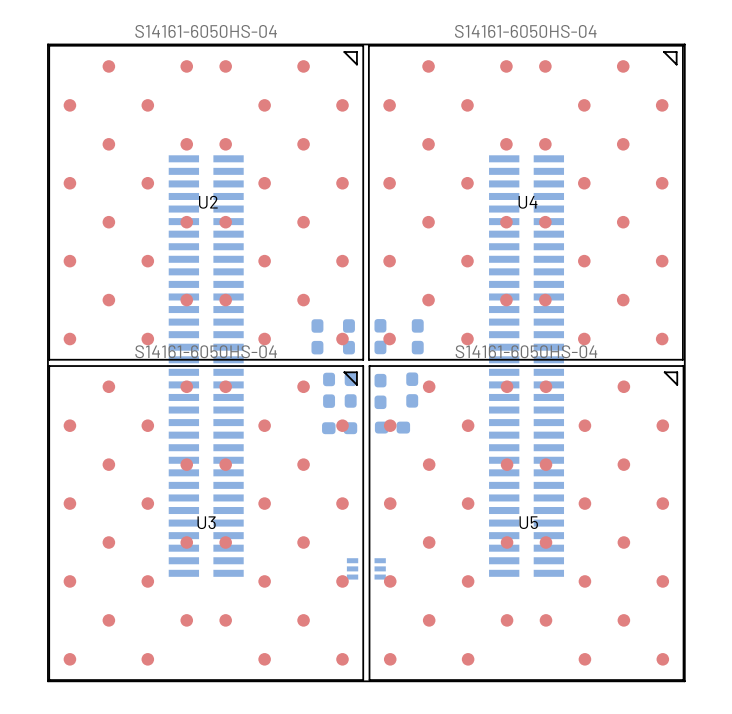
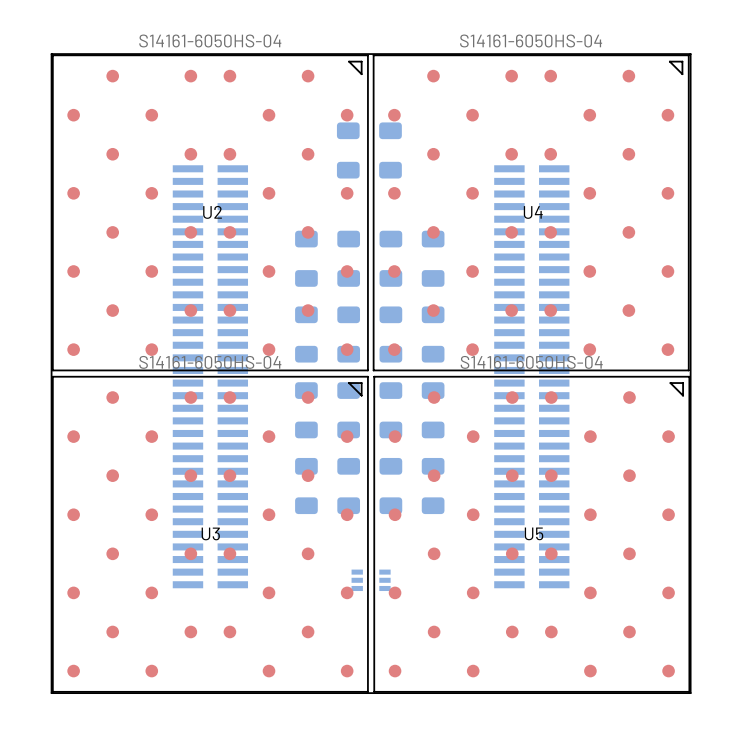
part: none -> (348, 150)
part: none -> (390, 150)
part: none -> (306, 258)
part: none -> (348, 258)
part: none -> (390, 258)
part: none -> (433, 258)
part: none -> (306, 334)
part: none -> (348, 334)
part: none -> (390, 334)
part: none -> (433, 334)
part: (317, 336) -> none
part: (348, 336) -> none
part: (380, 336) -> none
part: (417, 336) -> none
part footprint: [374, 373, 387, 410] -> [379, 382, 403, 439]
part: (329, 390) -> none
part: (350, 390) -> none
part: (412, 390) -> none
part: none -> (306, 410)
part: none -> (348, 410)
part: none -> (433, 410)
part: (392, 427) -> none
part: (339, 428) -> none
part: none -> (306, 486)
part: none -> (348, 486)
part: none -> (390, 486)
part: none -> (433, 486)

